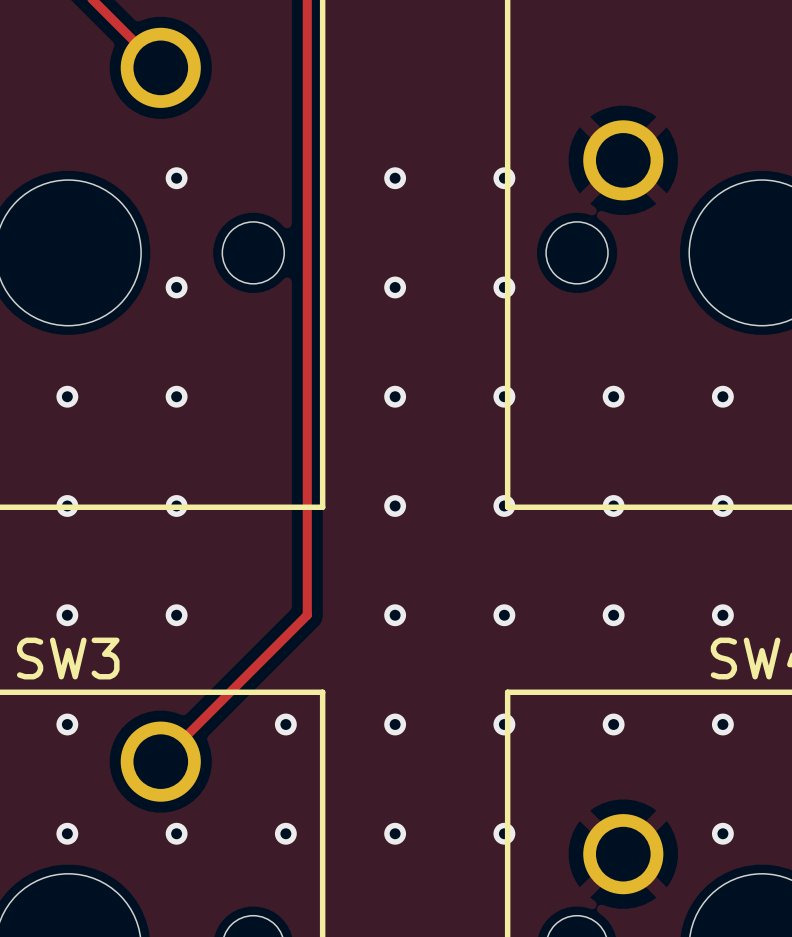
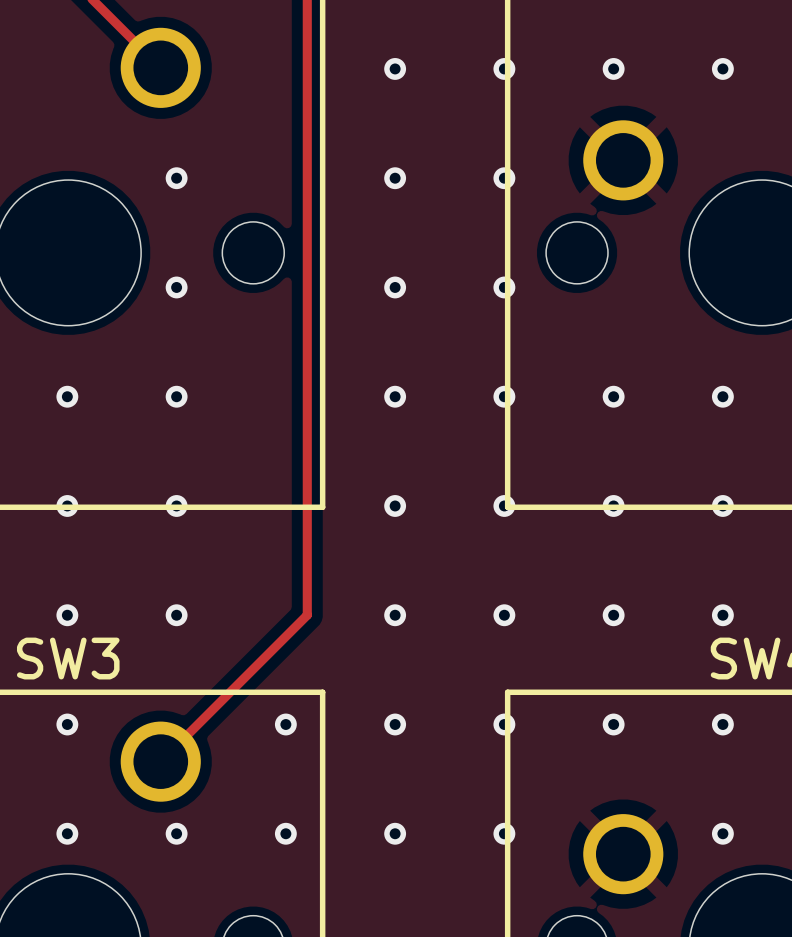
via: none -> (395, 68)
via: none -> (504, 68)
via: none -> (613, 68)
via: none -> (722, 68)

